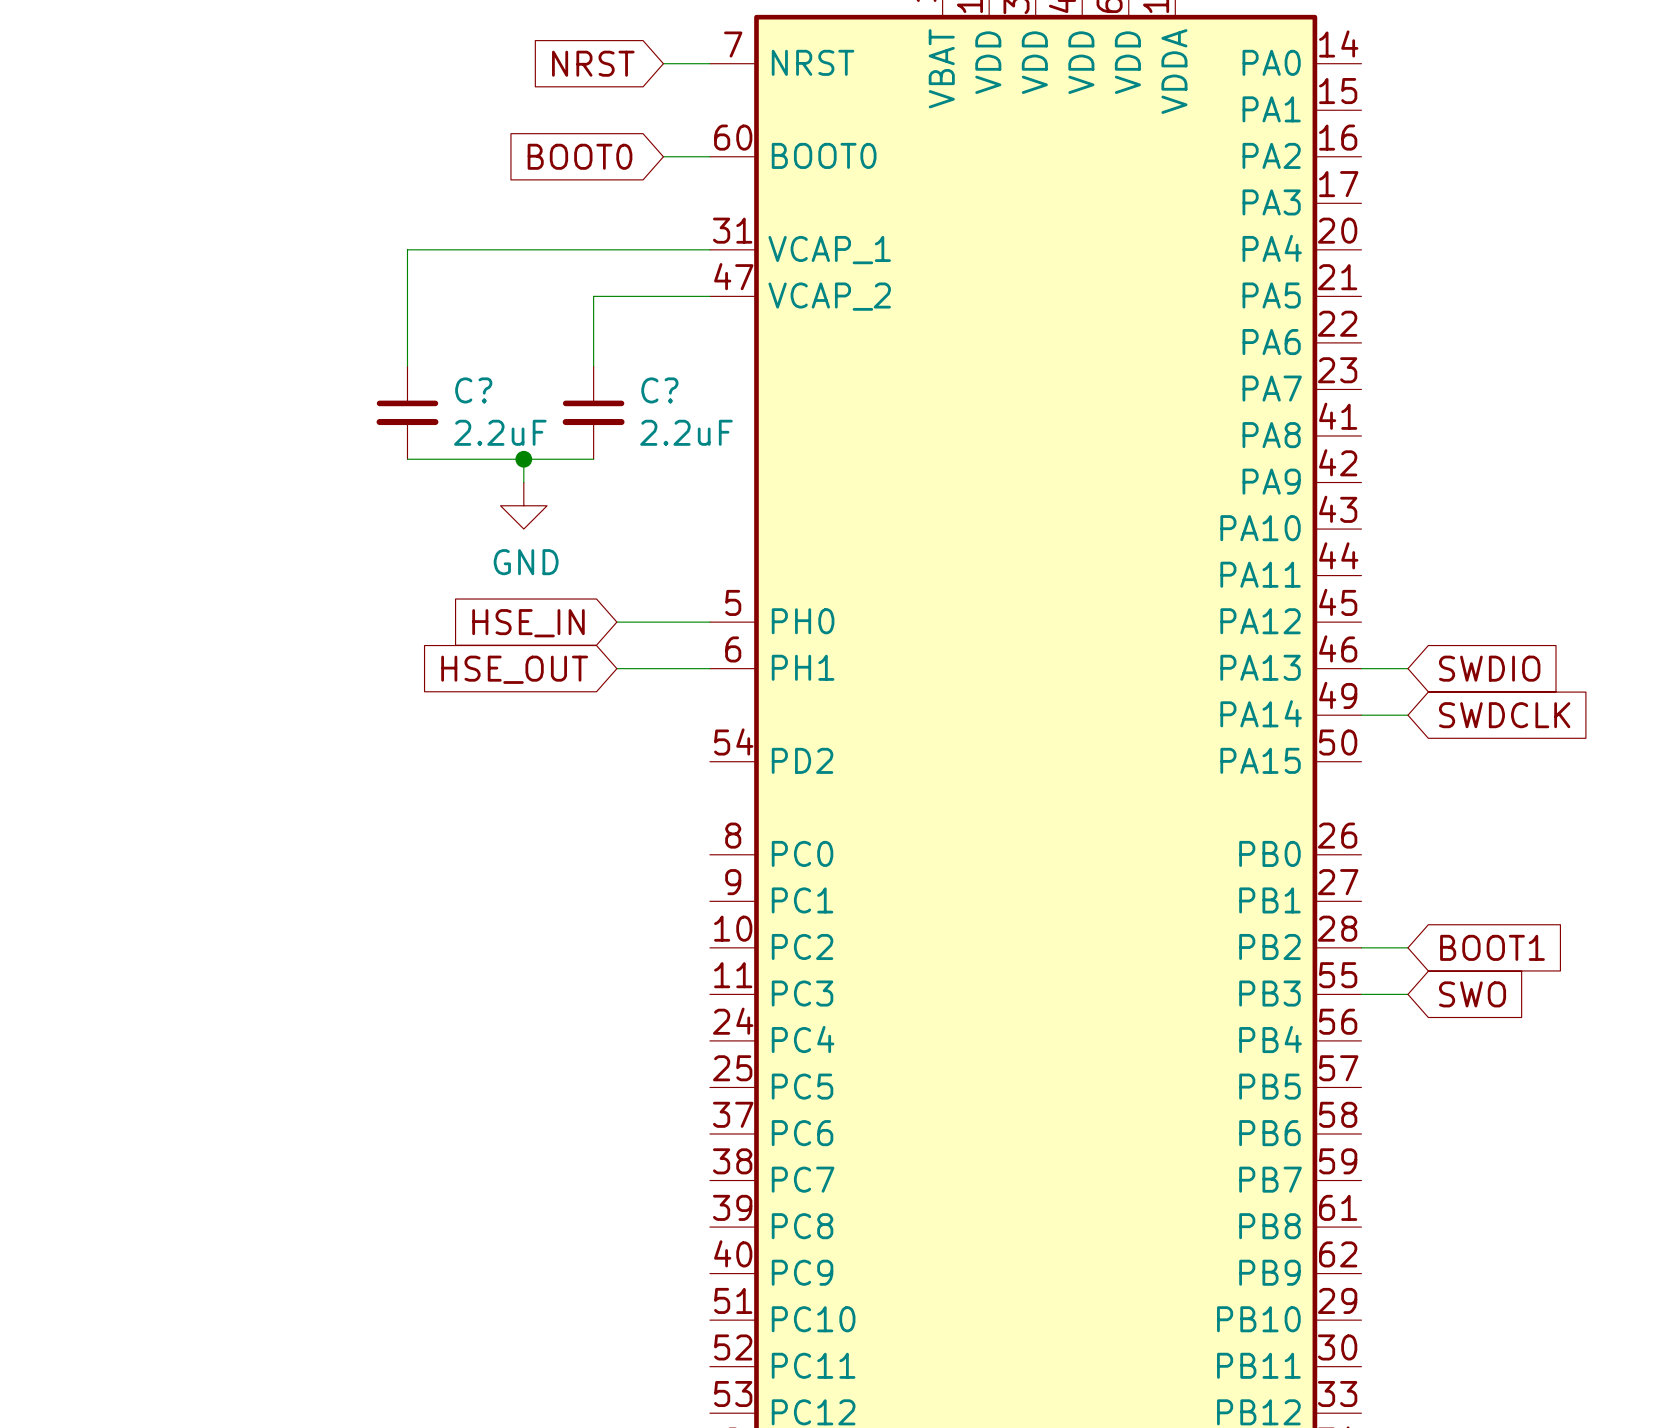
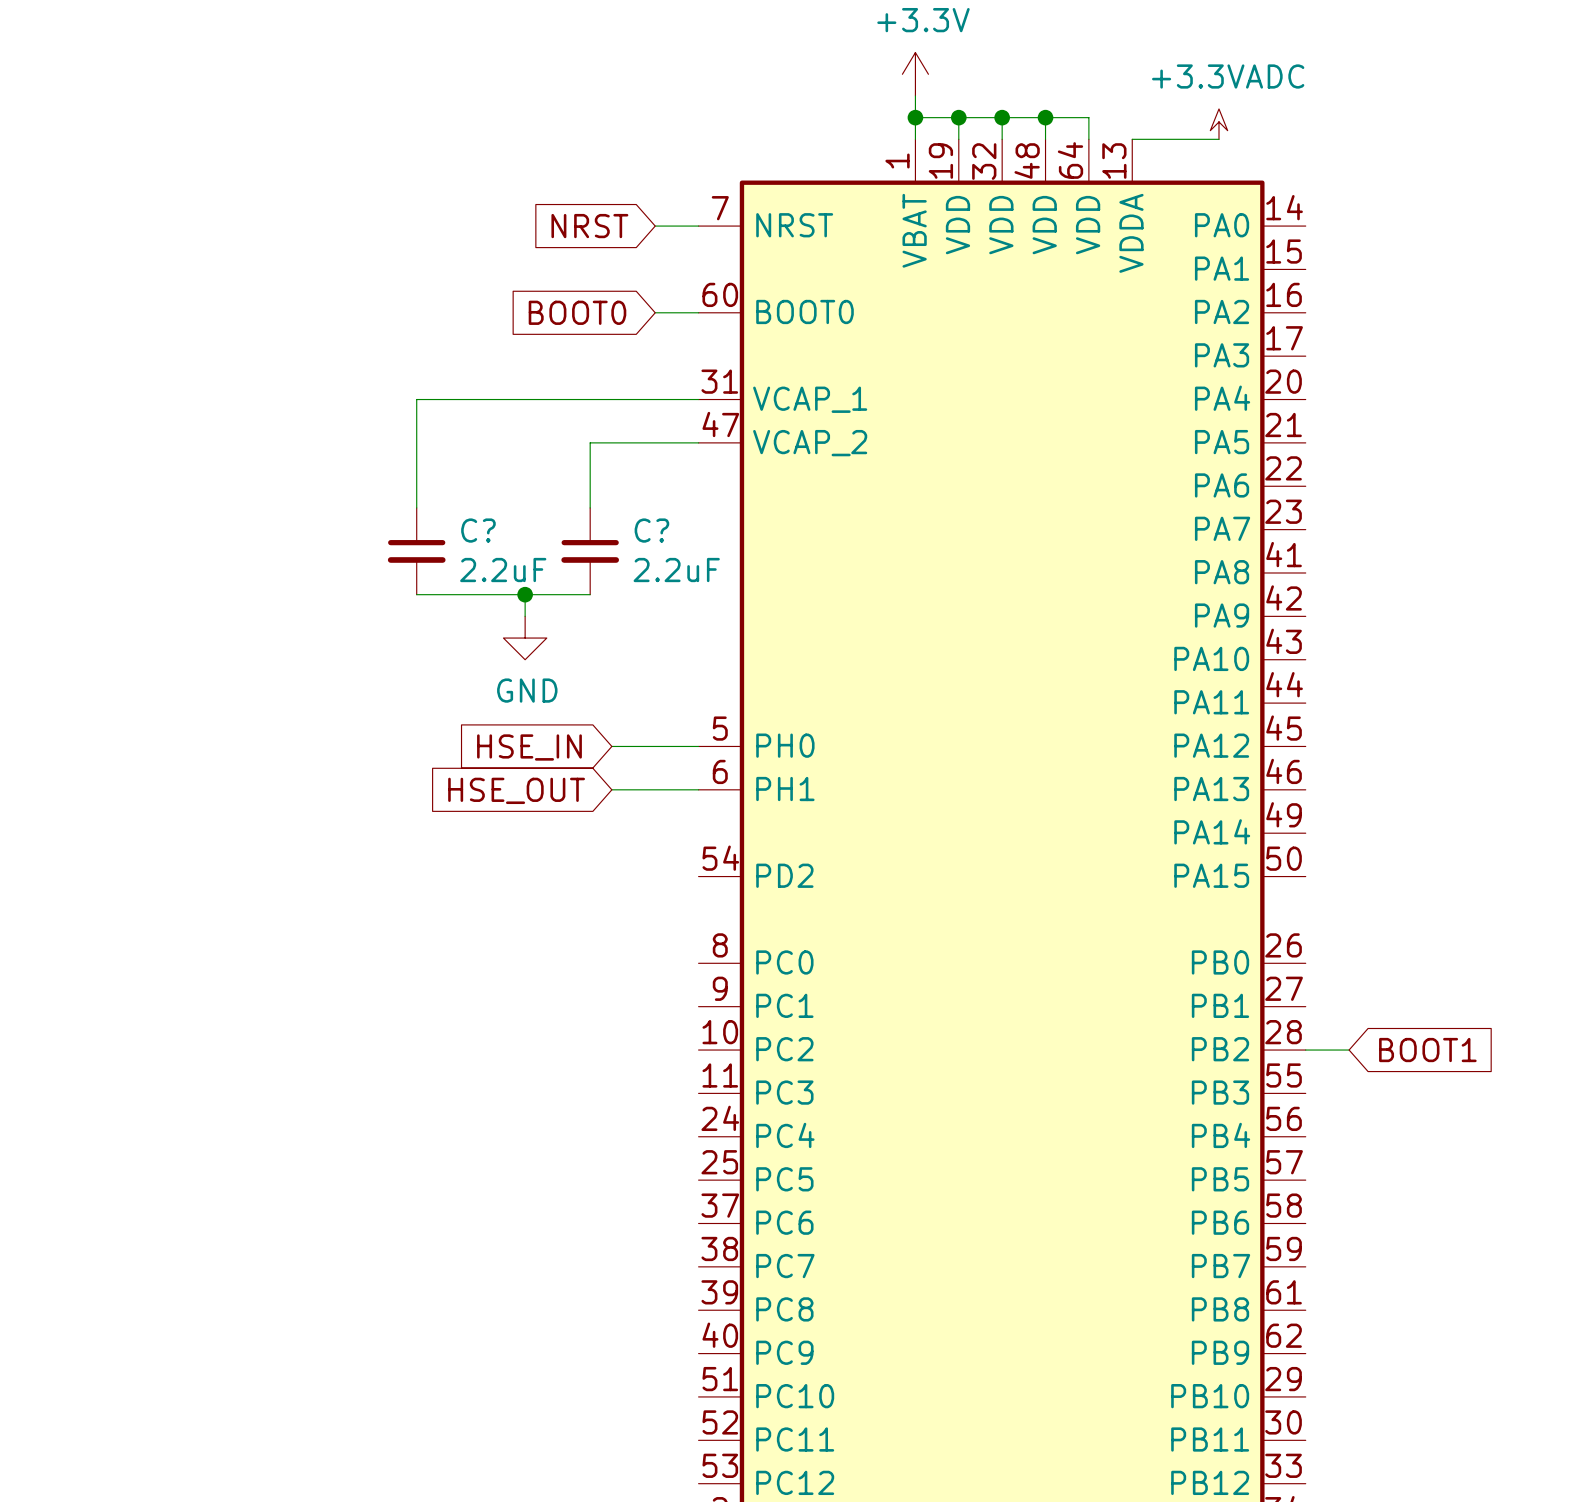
wire: (1361, 668) (1407, 668) -> none
global label: SWDIO (1489, 668) -> none
wire: (1361, 715) (1407, 715) -> none
global label: SWDCLK (1504, 715) -> none
wire: (1361, 994) (1407, 994) -> none
global label: SWO (1472, 994) -> none

